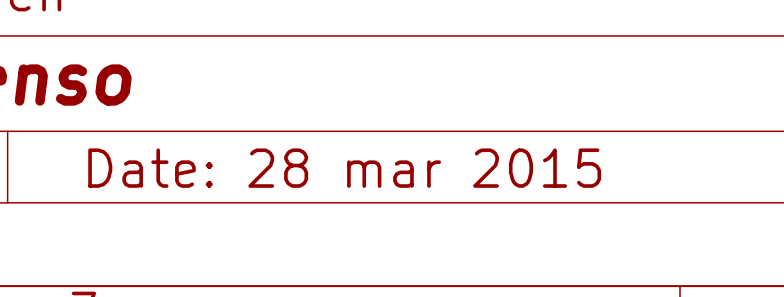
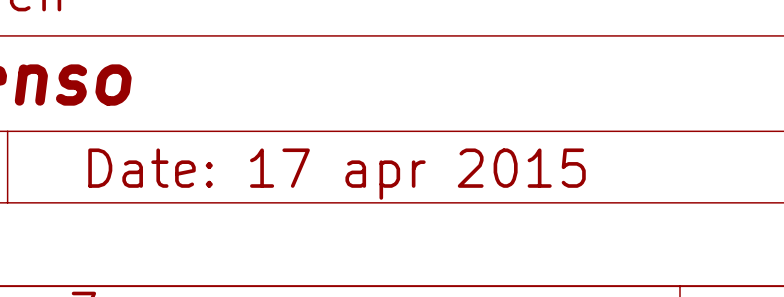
title block: Date: 28 mar 2015 (344, 168) -> Date: 17 apr 2015 (337, 174)

